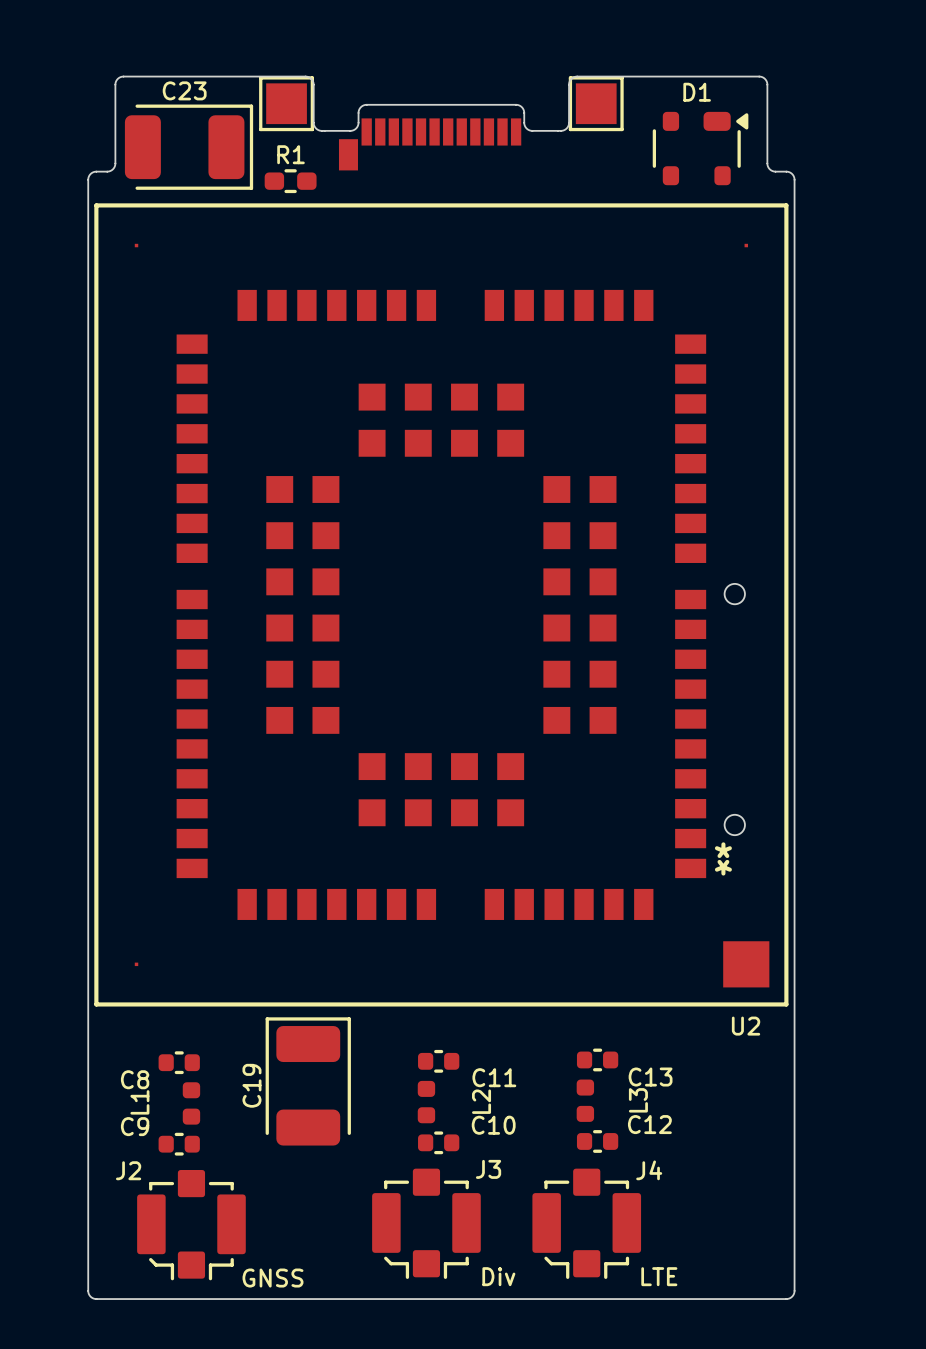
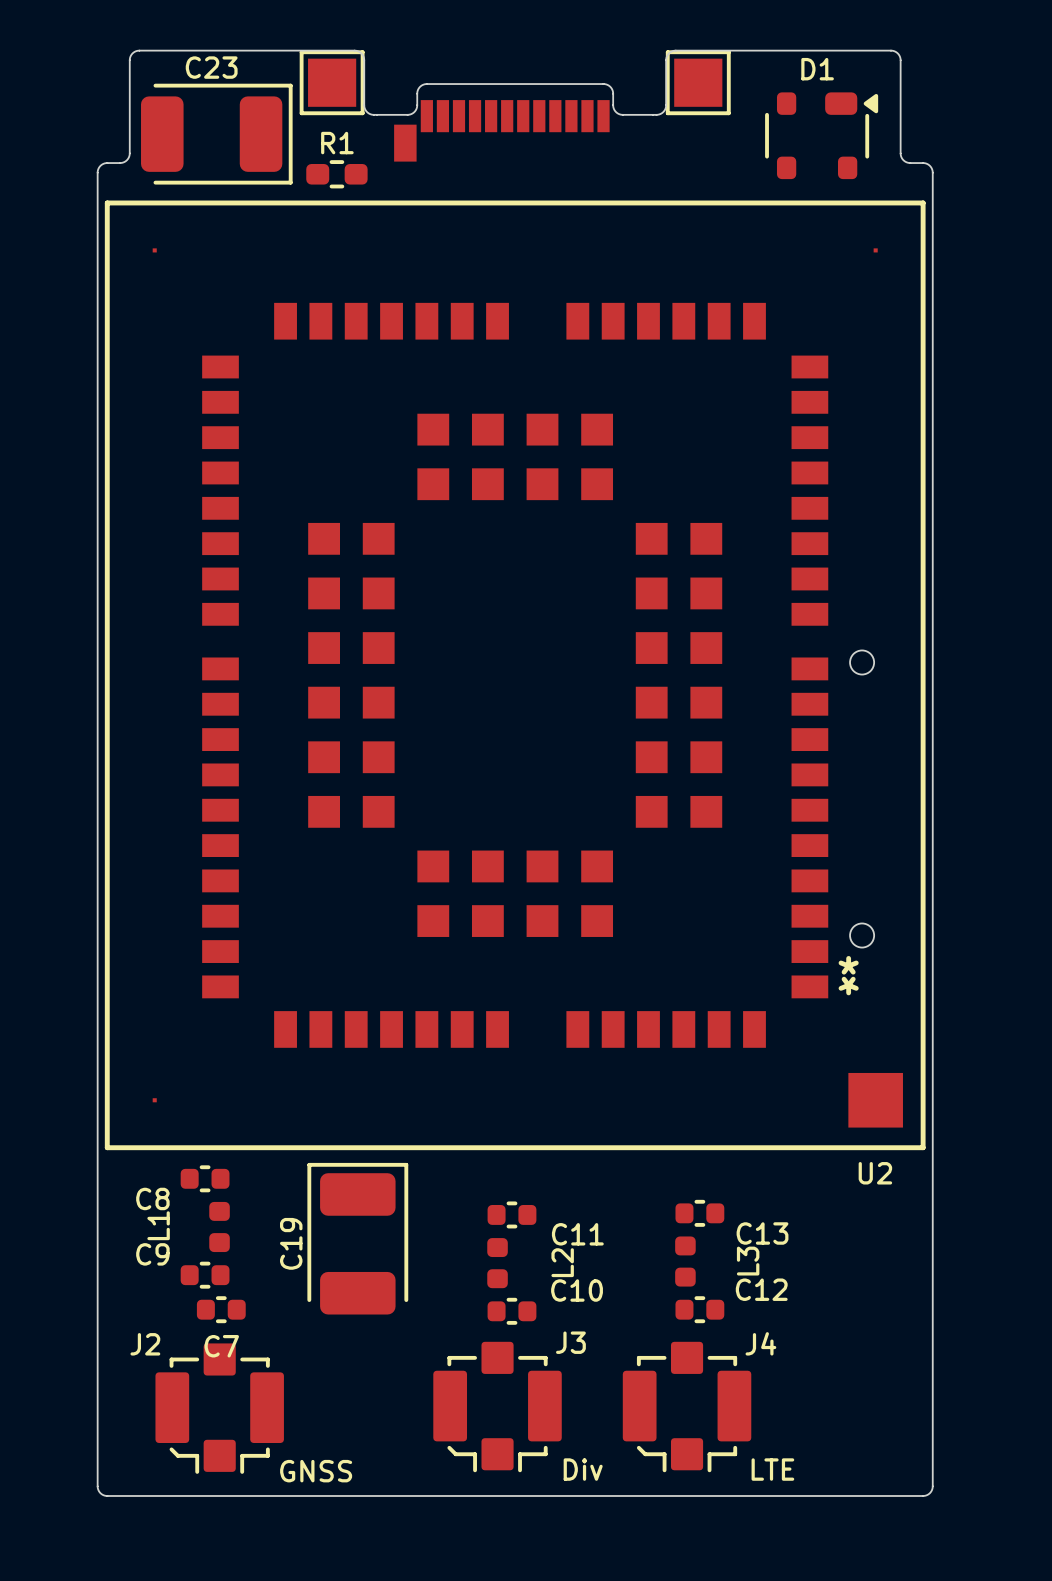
C8 position: (179, 1062) -> (205, 1178)
L1 position: (191, 1103) -> (219, 1226)
C7: none -> (221, 1309)
C9 position: (179, 1144) -> (205, 1275)

